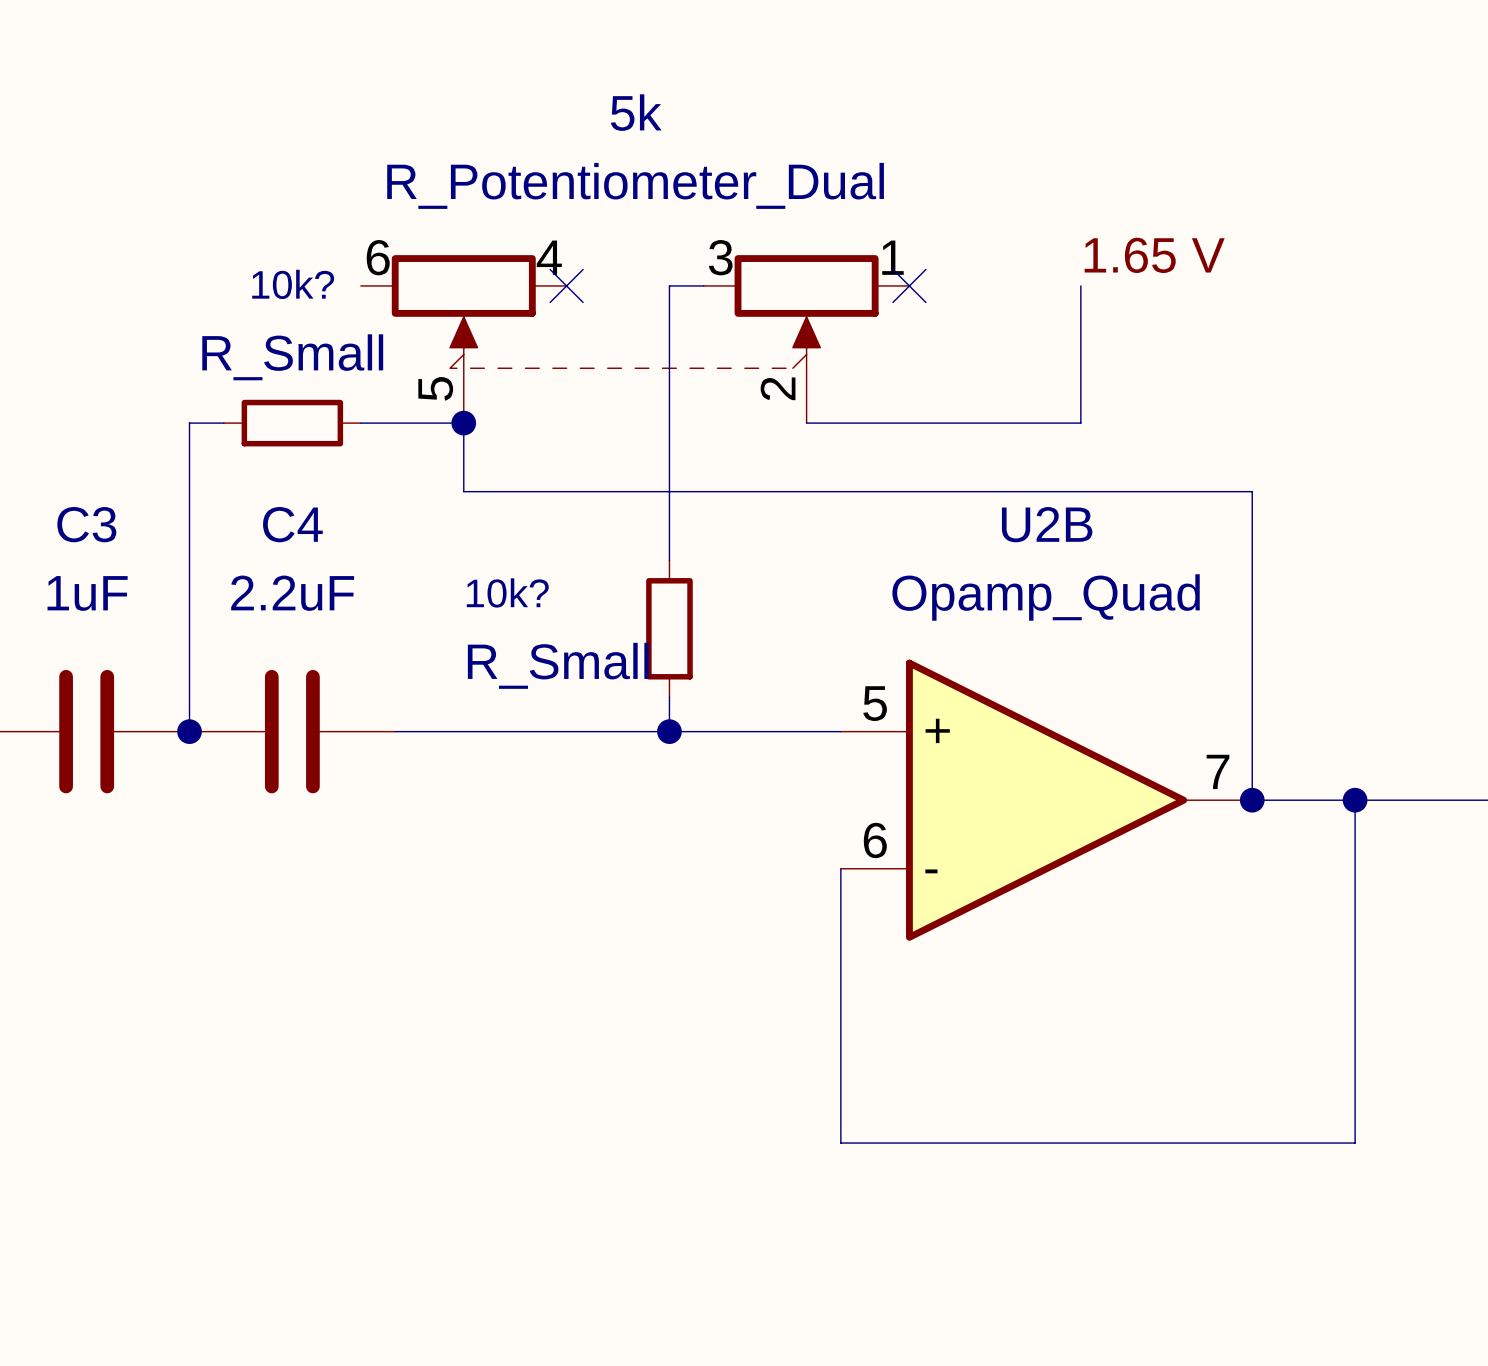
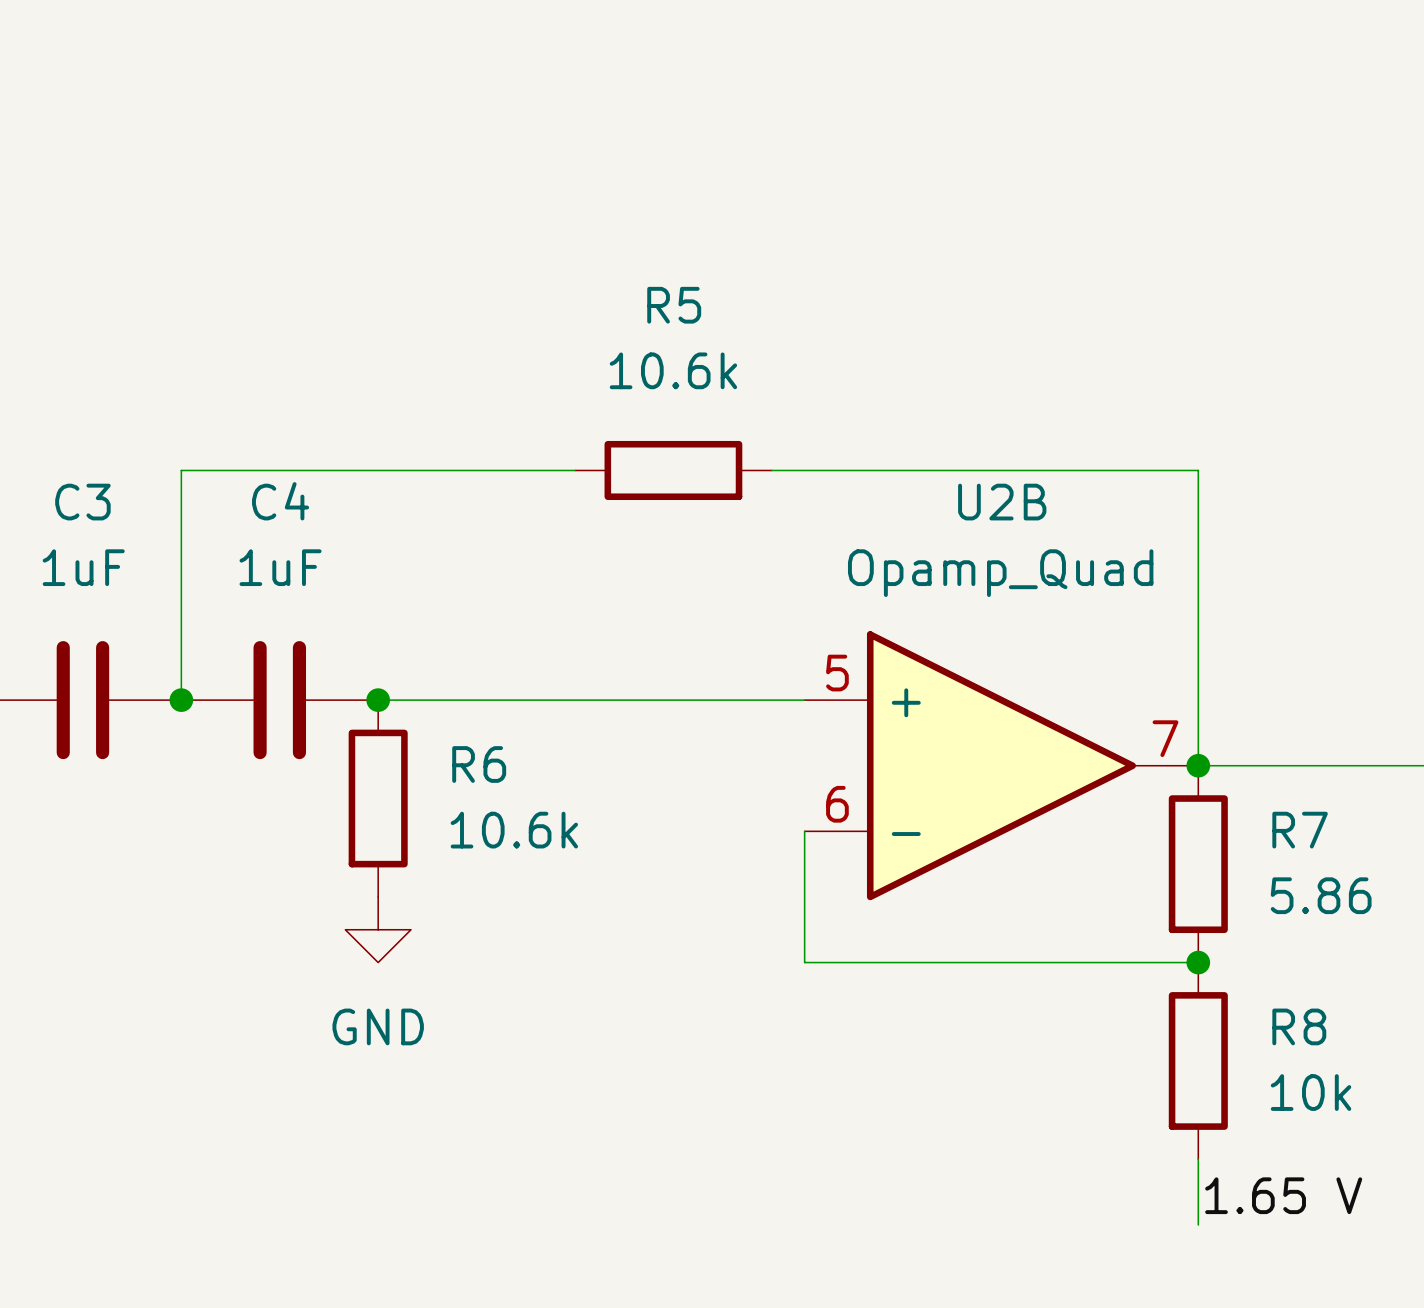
label: 1.65 V (1154, 255) -> none
no-connect mark: (566, 285) -> none
wire: (703, 285) (669, 285) (669, 560) -> none
no-connect mark: (909, 285) -> none
wire: (1080, 285) (1080, 423) (806, 423) -> none
5k: R_Potentiometer_Dual (635, 339) -> none
wire: (223, 423) (189, 423) (189, 491) -> none
10k?: R_Small (292, 423) -> none
wire: (360, 423) (463, 423) (463, 491) -> (181, 470) (443, 470)
junction: (463, 423) -> none
wire: (600, 491) (806, 491) -> none
R5: none -> 10.6k (673, 470)
C4 value: 2.2uF (292, 593) -> 1uF (280, 567)
10k?: R_Small (669, 628) -> none
wire: (669, 697) (669, 731) -> none
junction: none -> (378, 700)
junction: (669, 731) -> none
wire: (1355, 800) (1355, 1143) (840, 1143) (840, 1005) -> (1198, 962) (804, 962)
junction: (1355, 800) -> none
R6: none -> 10.6k (378, 798)
R7: none -> 5.86 (1198, 864)
power symbol: none -> GND (378, 929)
junction: none -> (1198, 962)
R8: none -> 10k (1198, 1060)
wire: none -> (1198, 1159) (1198, 1224)
label: none -> 1.65 V (1283, 1195)

